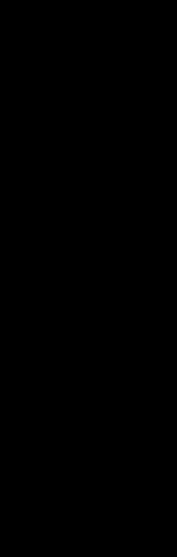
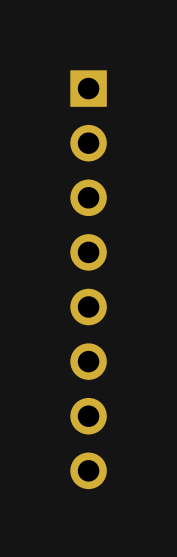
part: none -> (88, 279)

